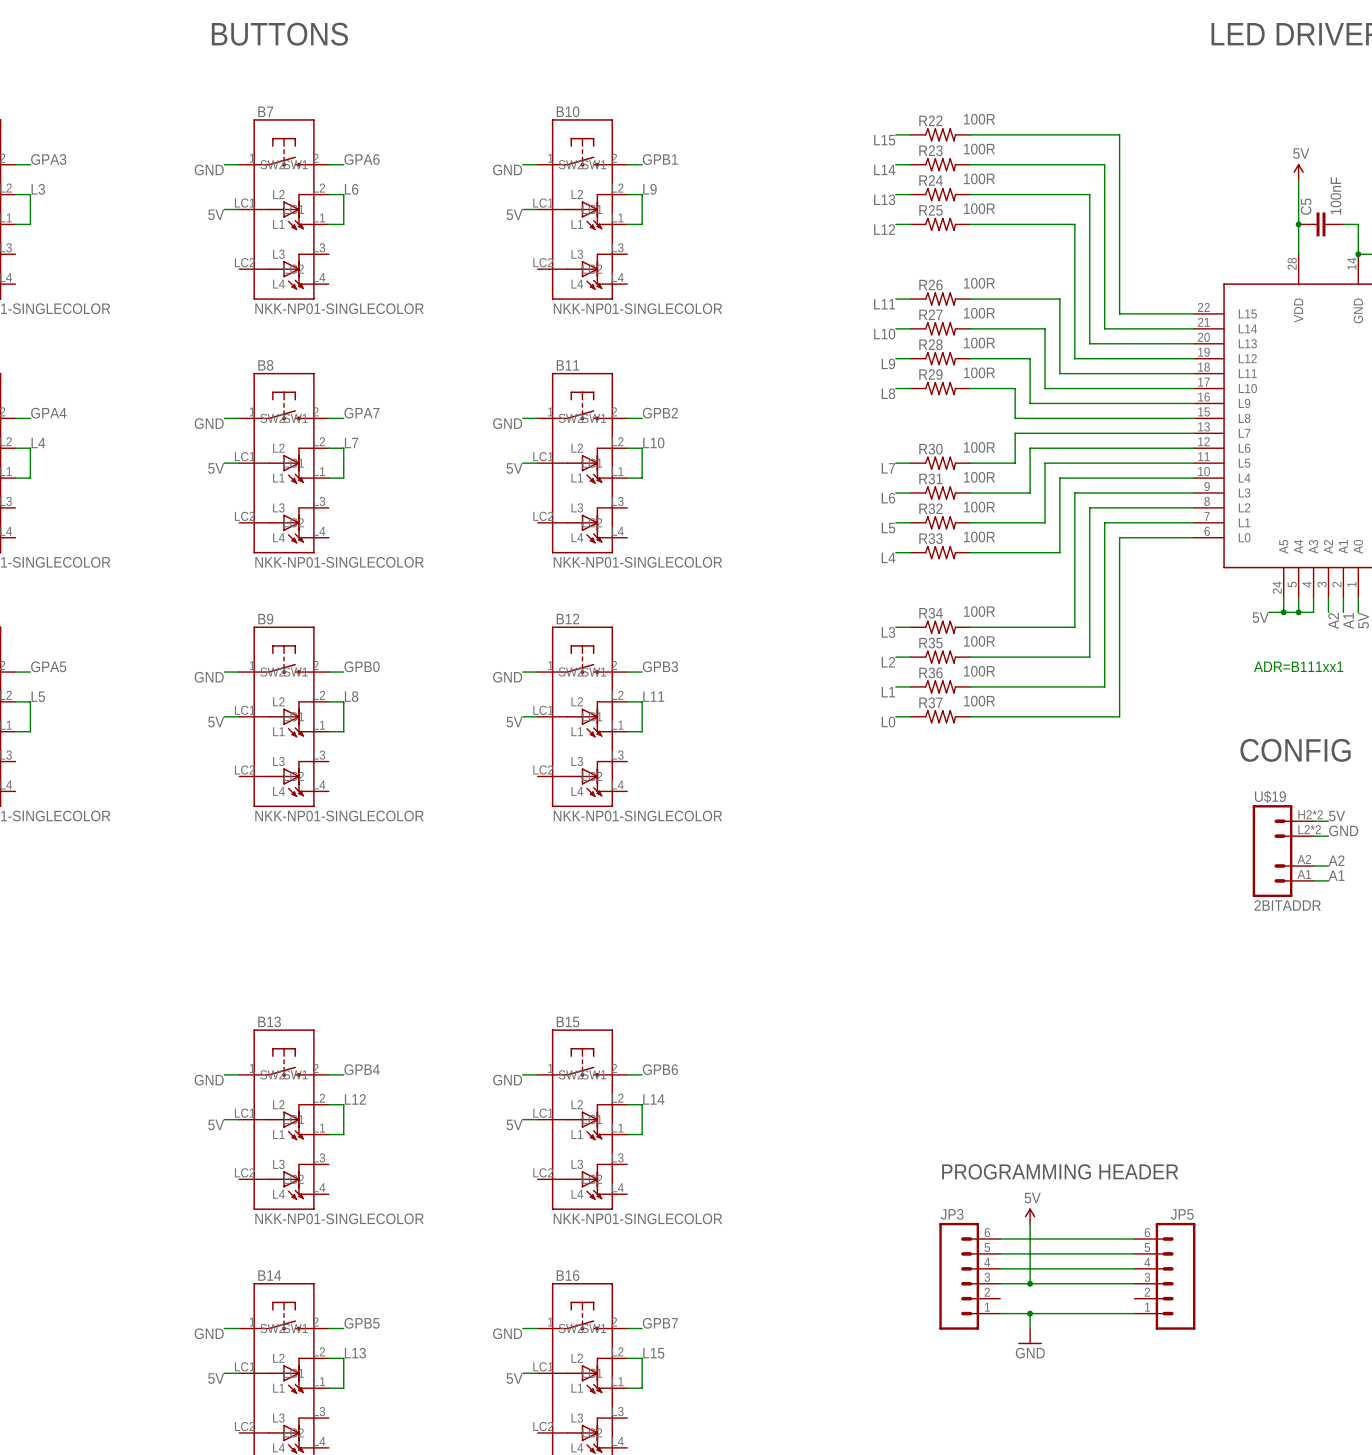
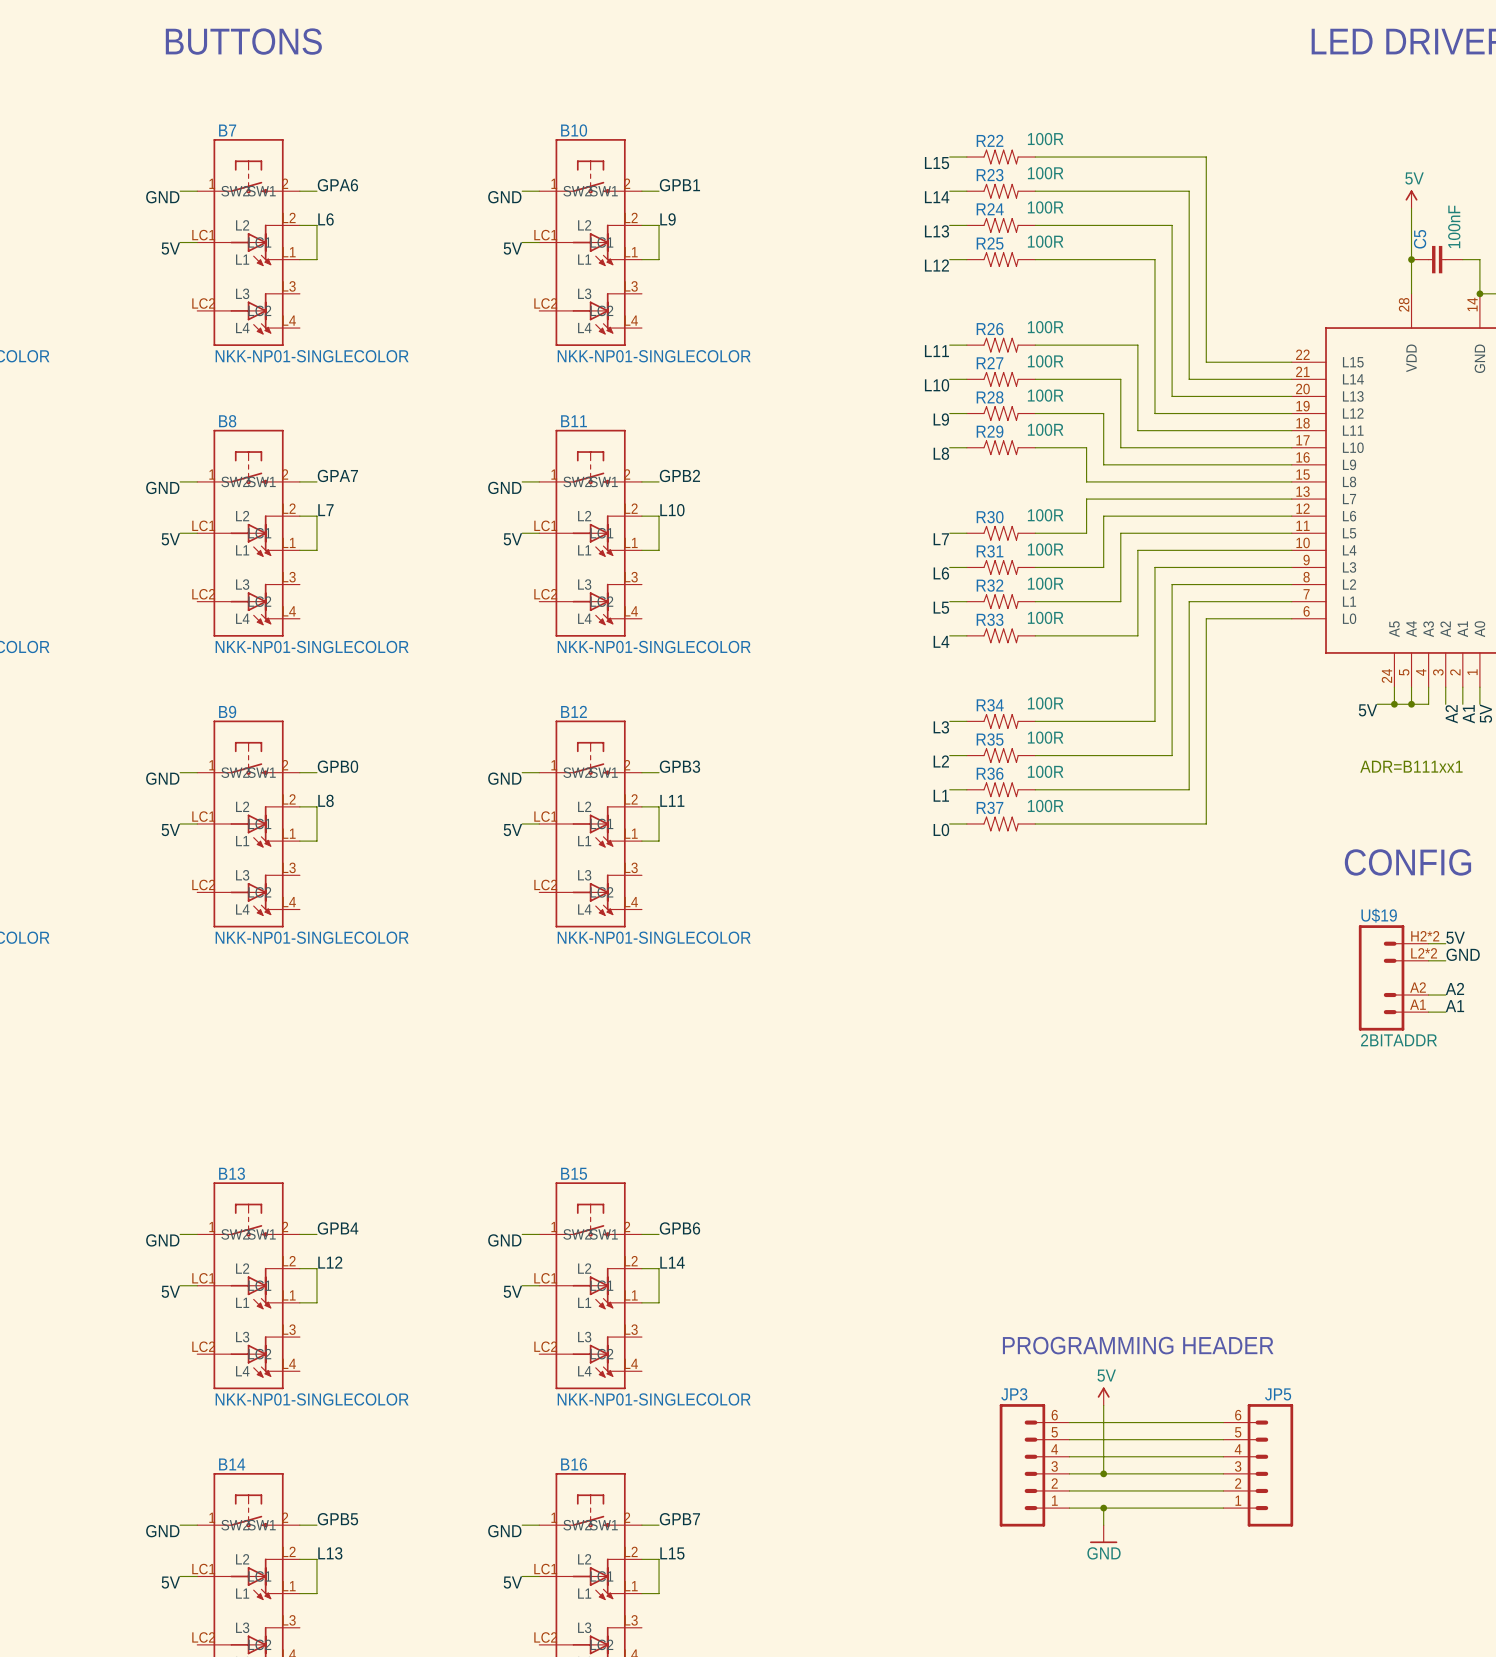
wire: none -> (1069, 1490) (1223, 1490)

